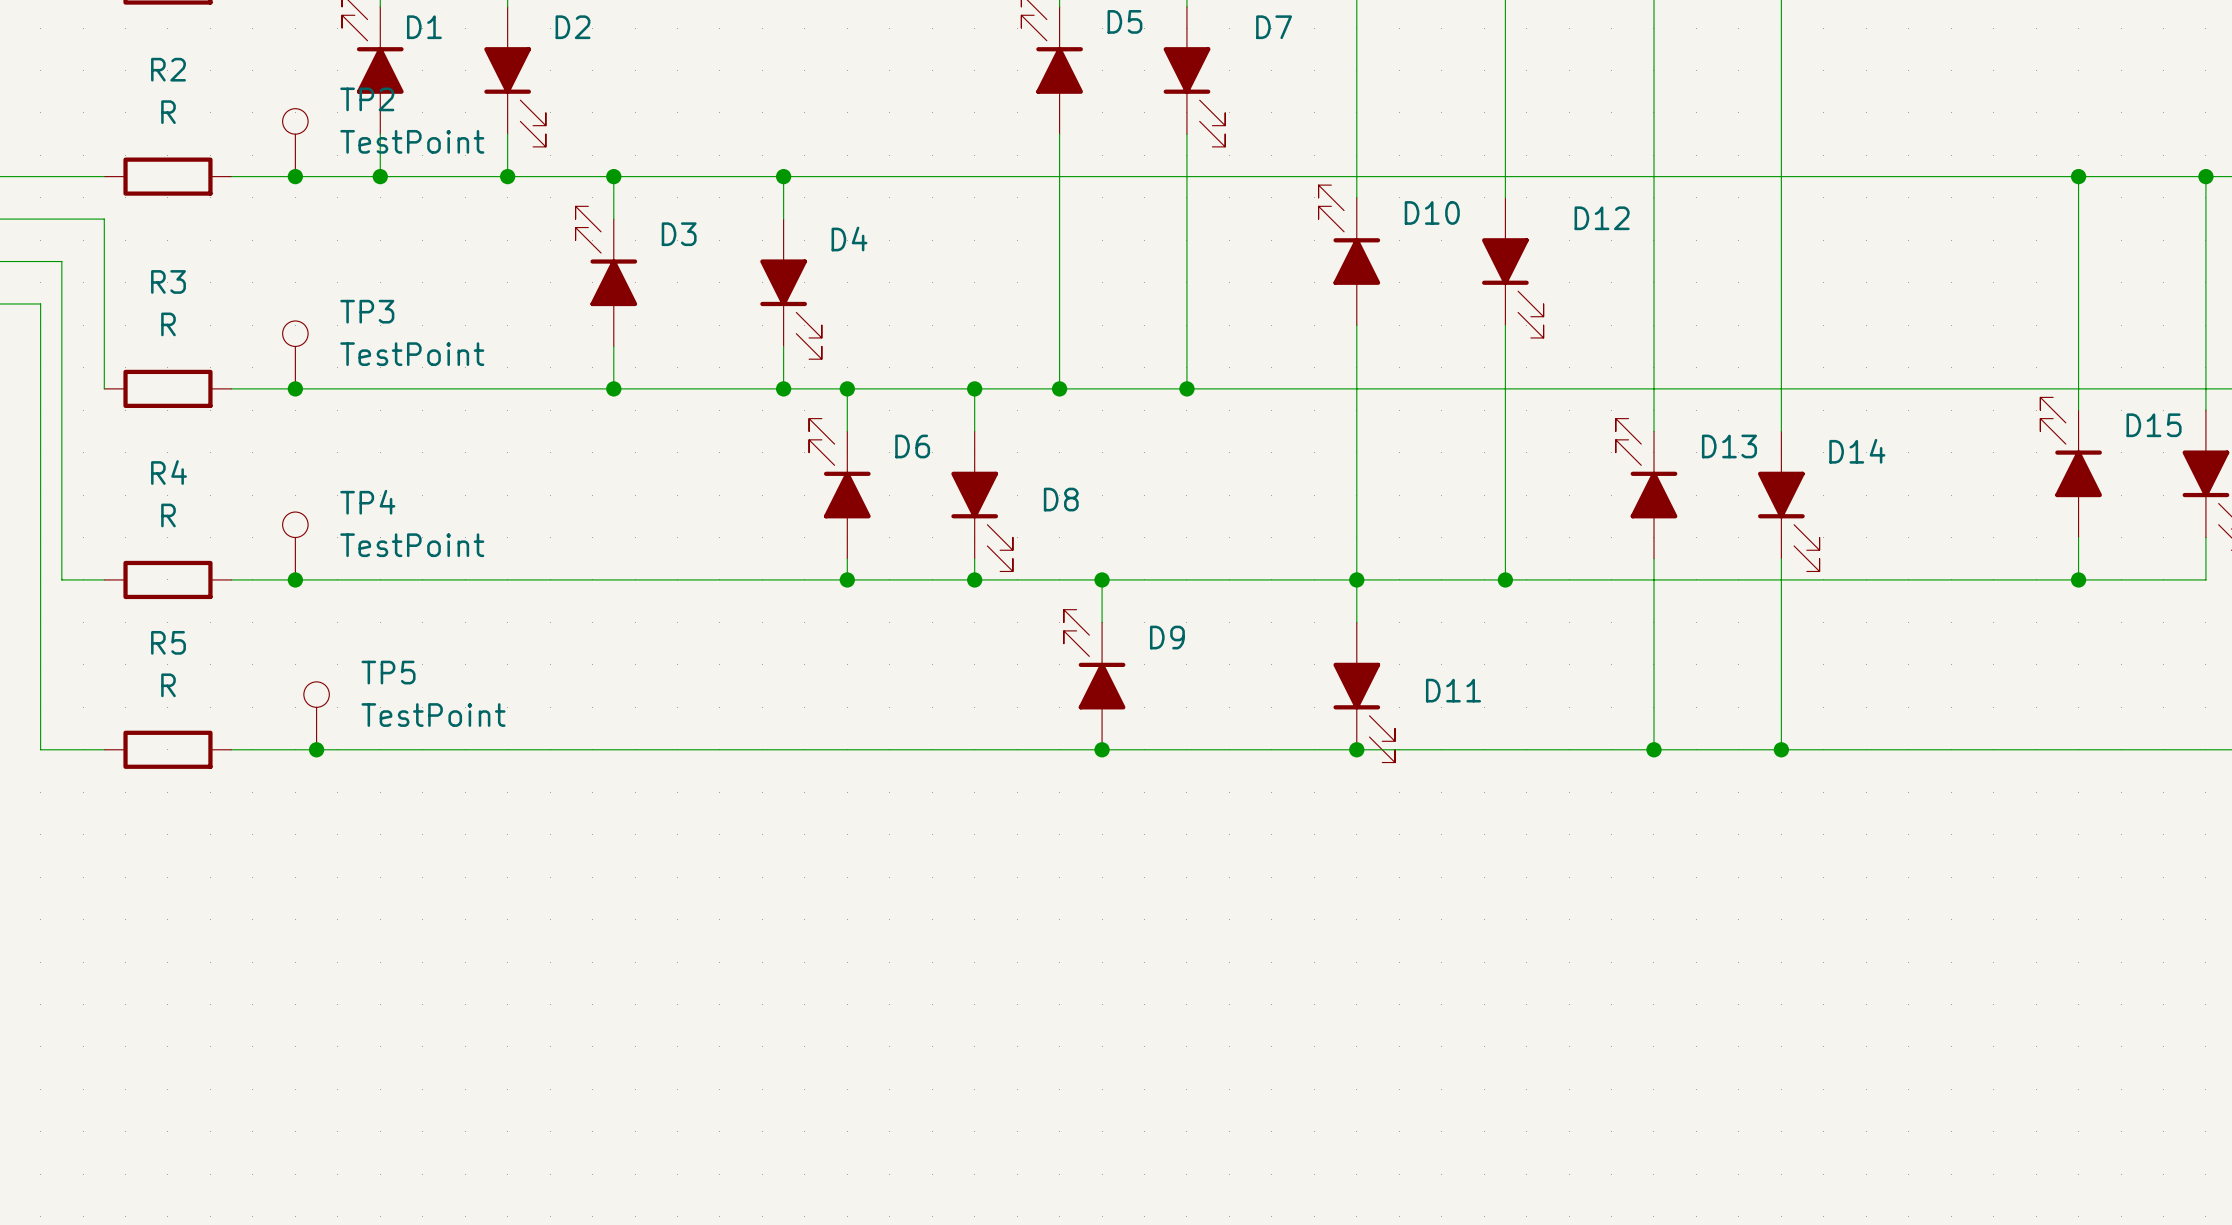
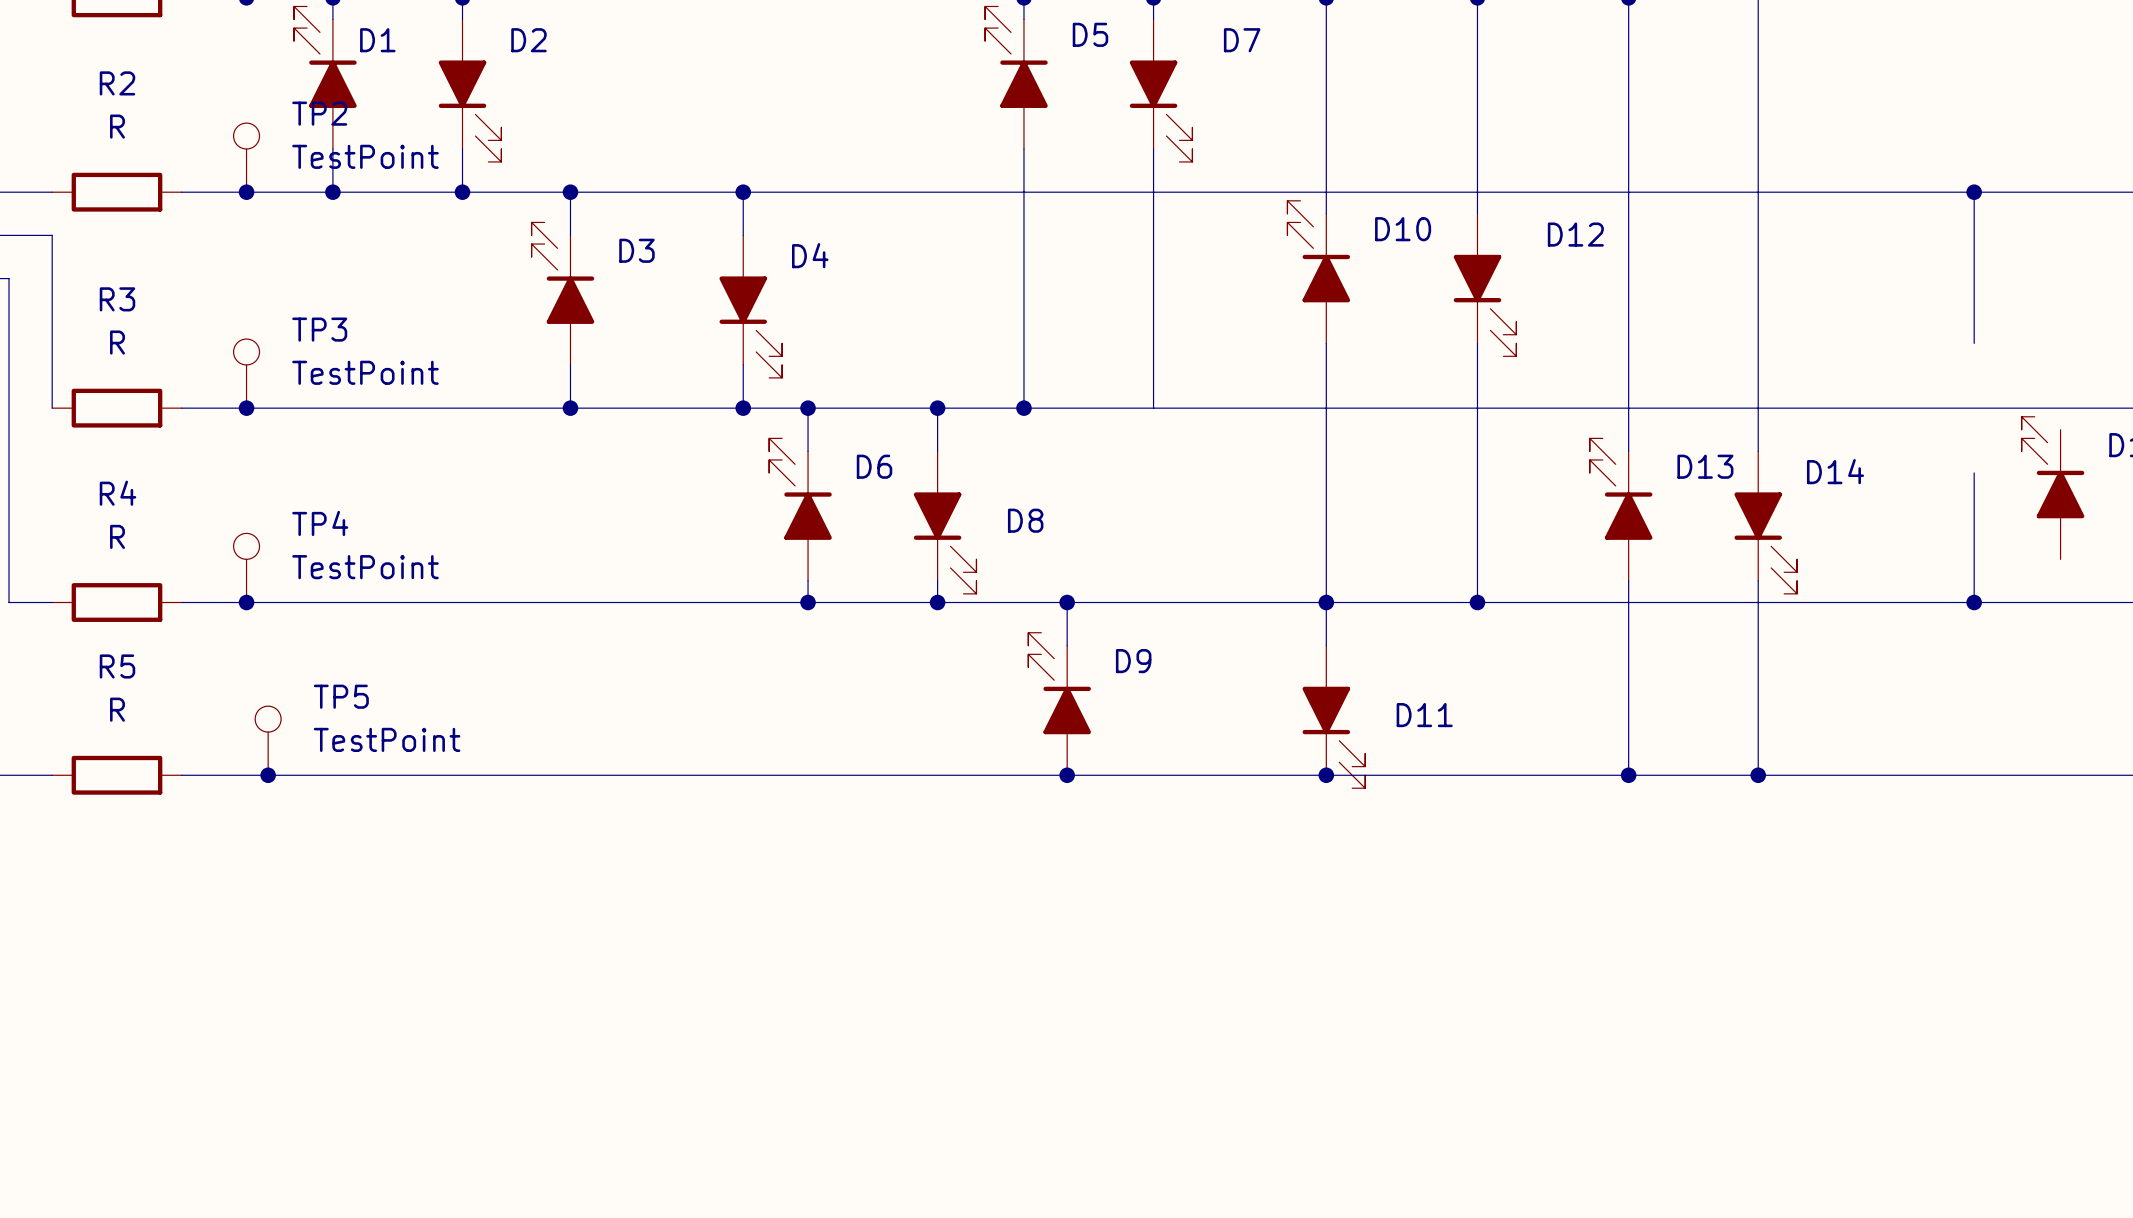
wire: none -> (1974, 192) (1974, 343)
wire: (2078, 176) (2078, 410) -> none
junction position: (2078, 176) -> (1974, 192)
junction: (1186, 388) -> none
wire: none -> (1974, 472) (1974, 602)
wire: (2078, 537) (2078, 579) -> none
junction position: (2078, 579) -> (1974, 602)

